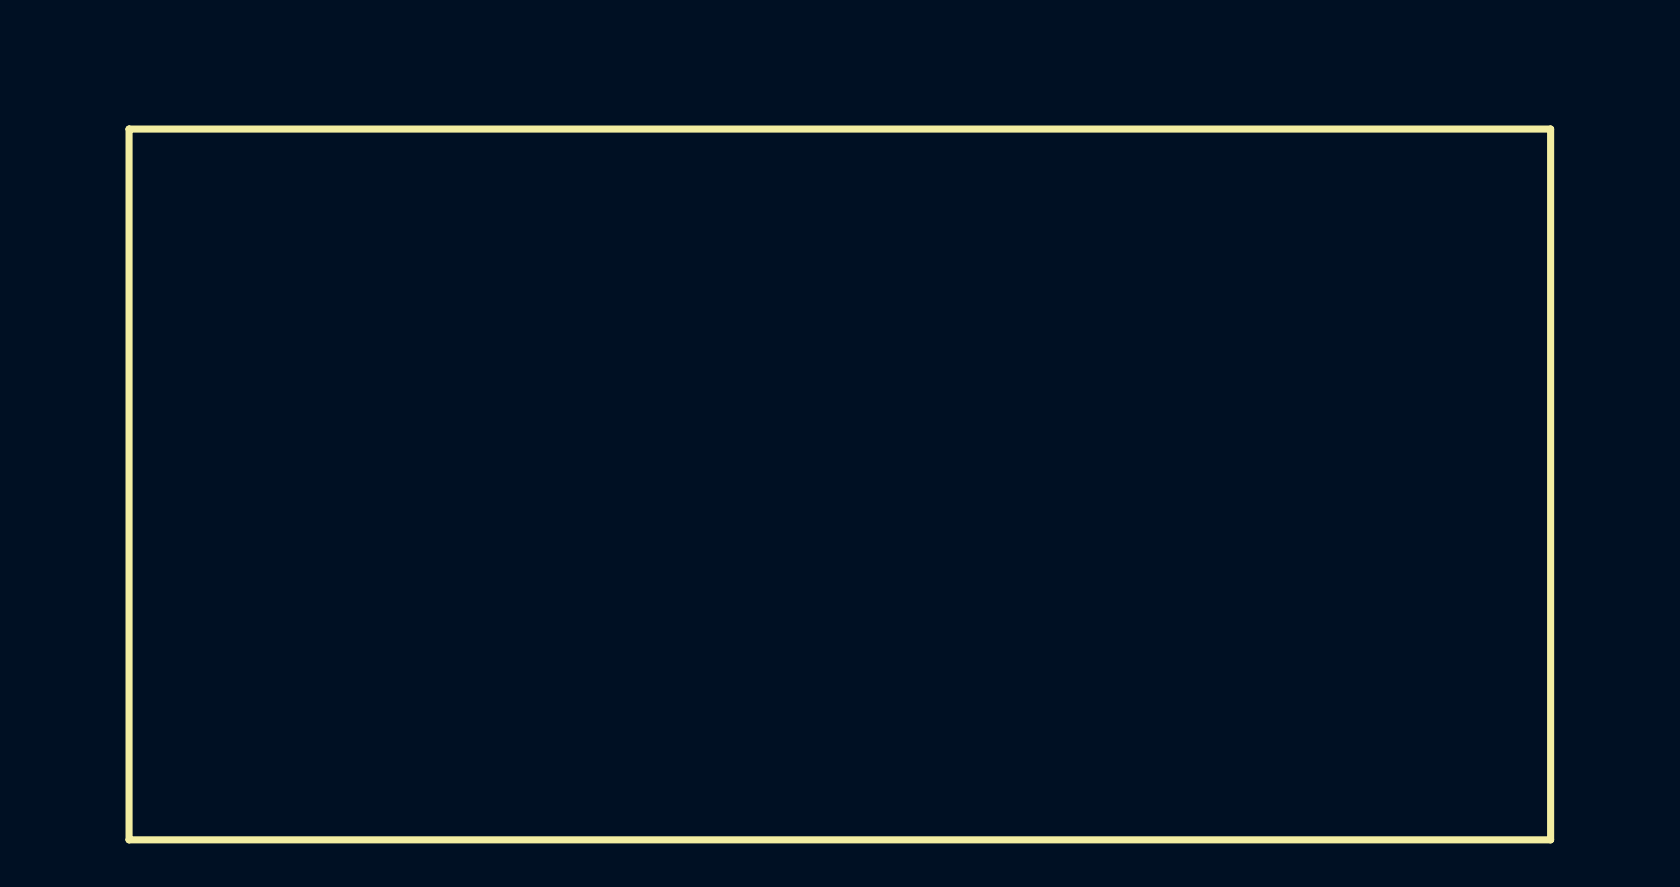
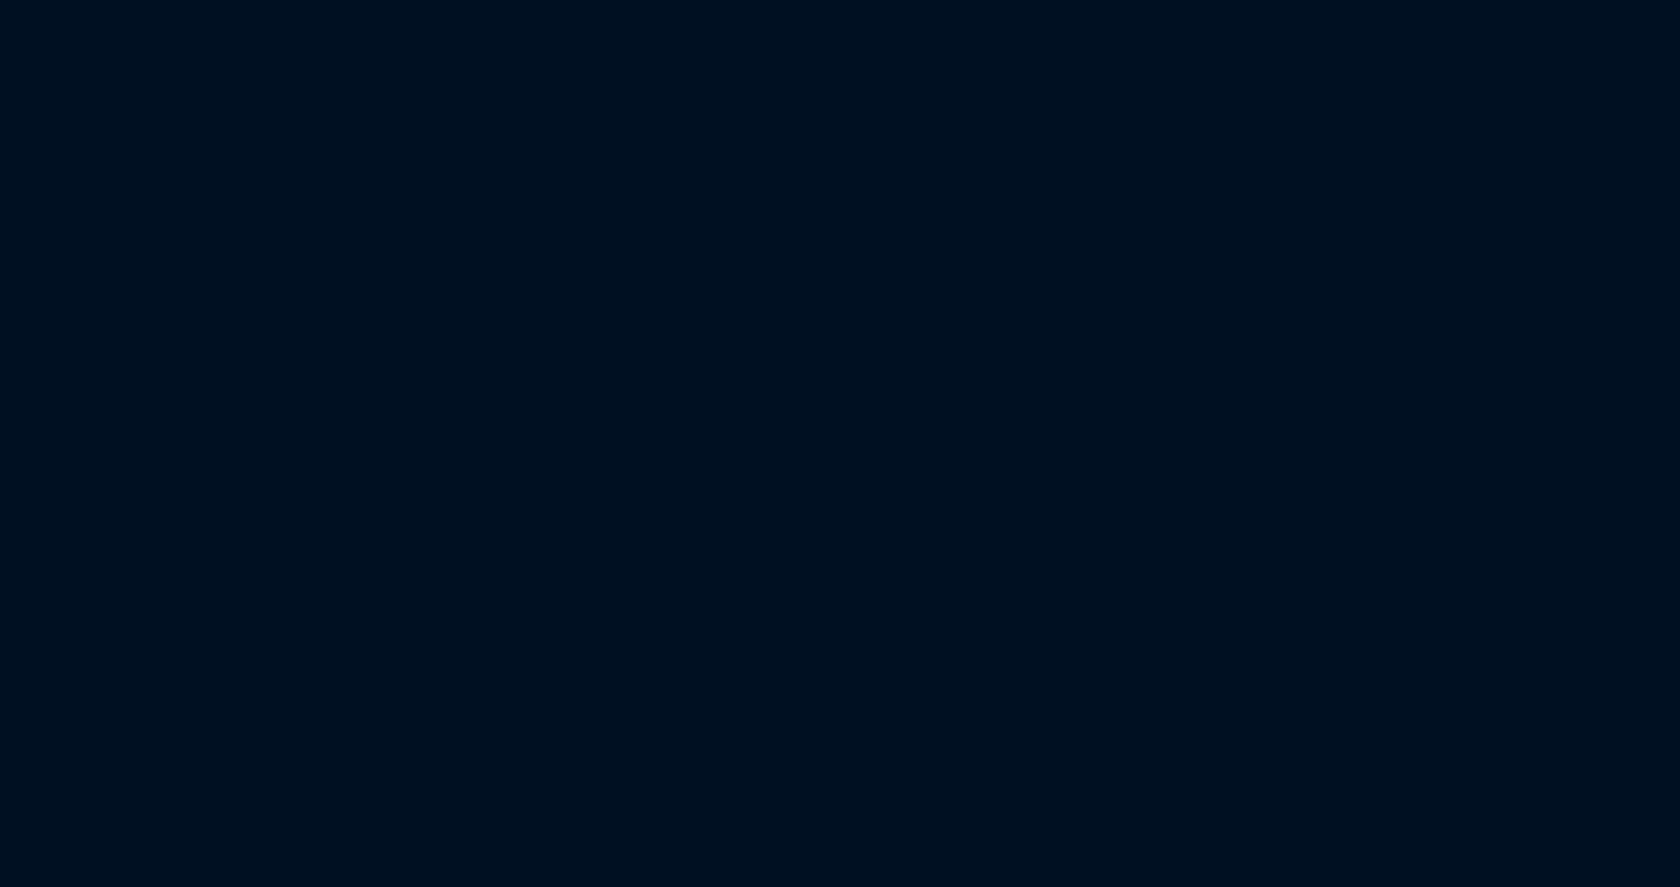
line: (129, 129) (129, 839) (1550, 839) (1550, 129) (129, 129) -> none

